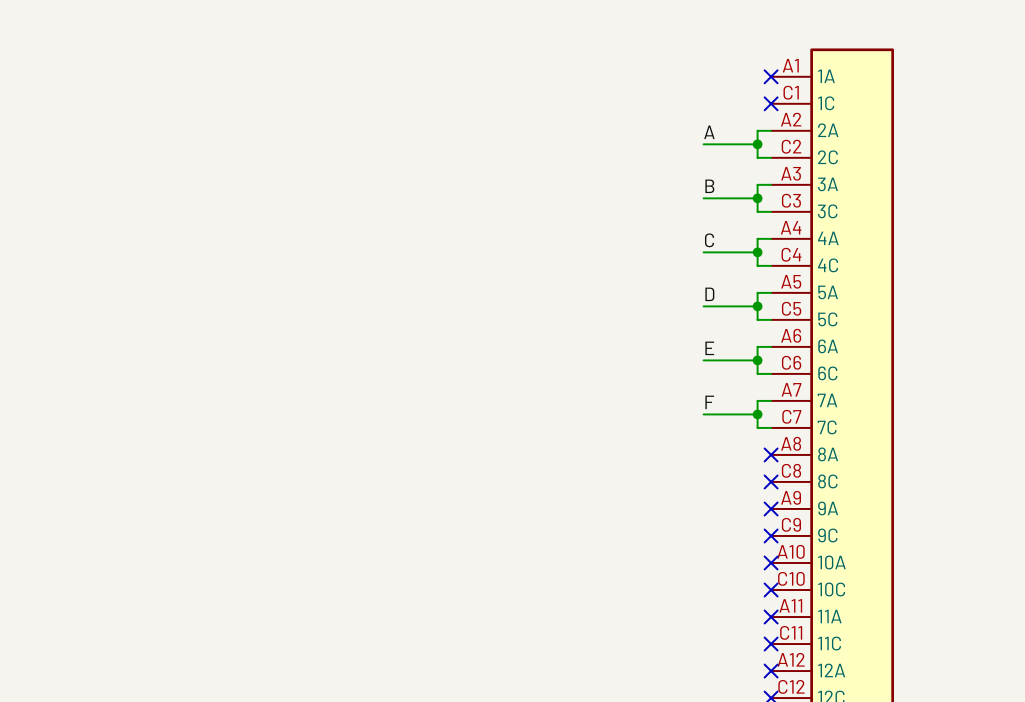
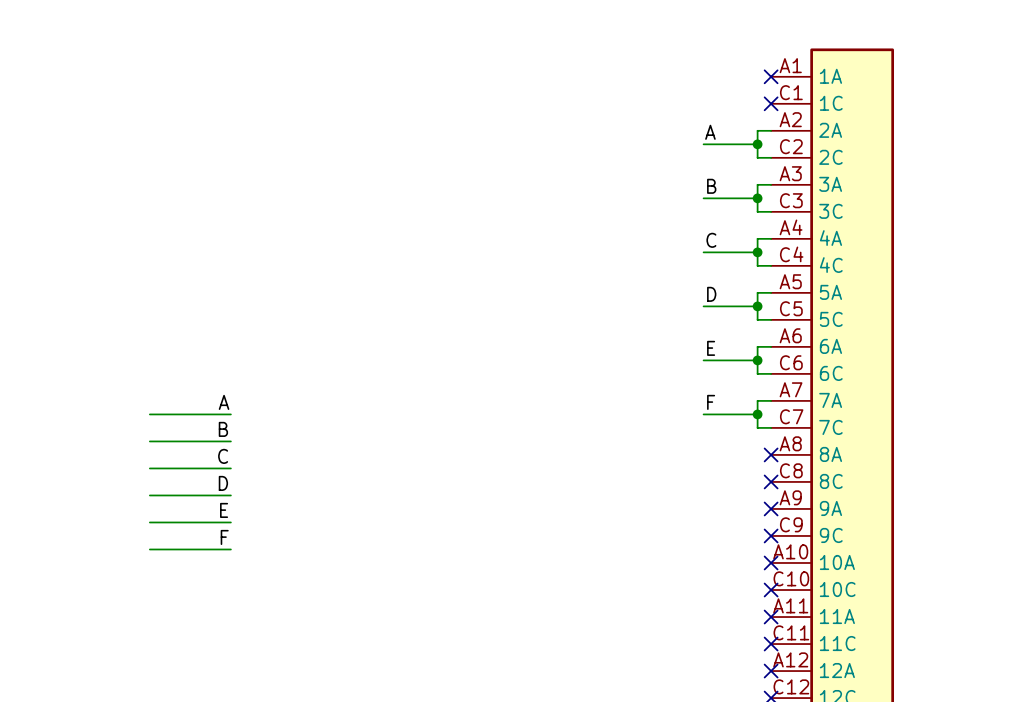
label: none -> A (224, 402)
wire: none -> (149, 414) (230, 414)
label: none -> B (223, 429)
wire: none -> (149, 441) (230, 441)
label: none -> C (223, 456)
wire: none -> (149, 468) (230, 468)
label: none -> D (223, 483)
wire: none -> (149, 495) (230, 495)
label: none -> E (224, 510)
wire: none -> (149, 522) (230, 522)
label: none -> F (224, 537)
wire: none -> (149, 549) (230, 549)

